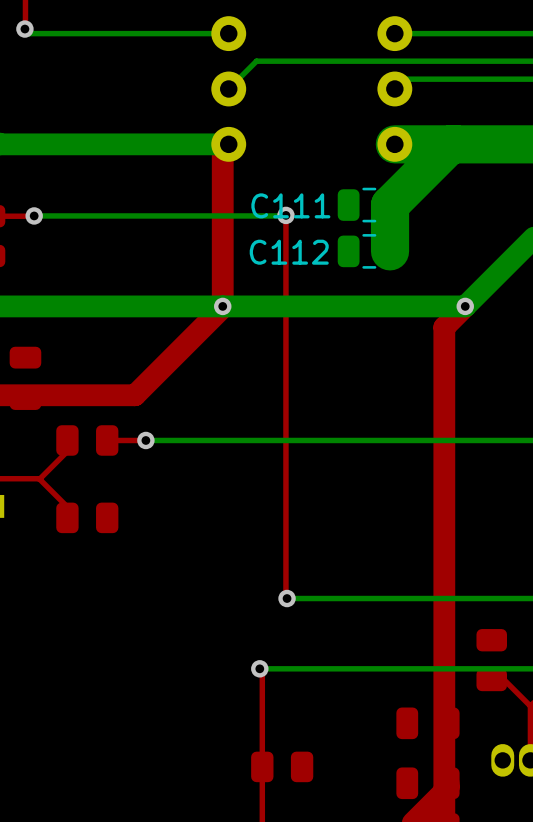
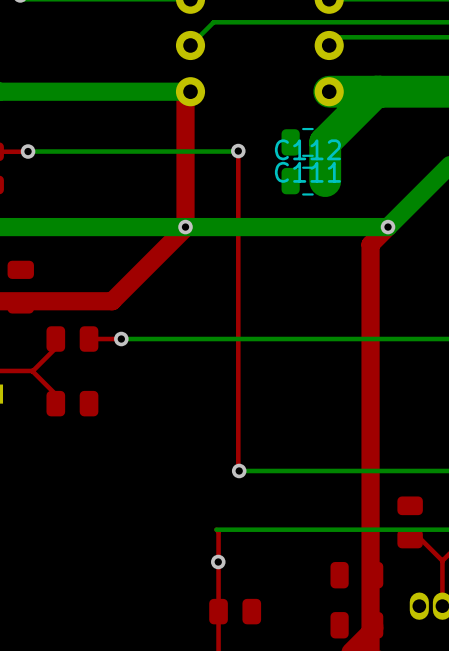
C111 name position: C111 (290, 205) -> C111 (307, 172)
C112 name position: C112 (289, 252) -> C112 (307, 149)
via position: (259, 668) -> (218, 562)

